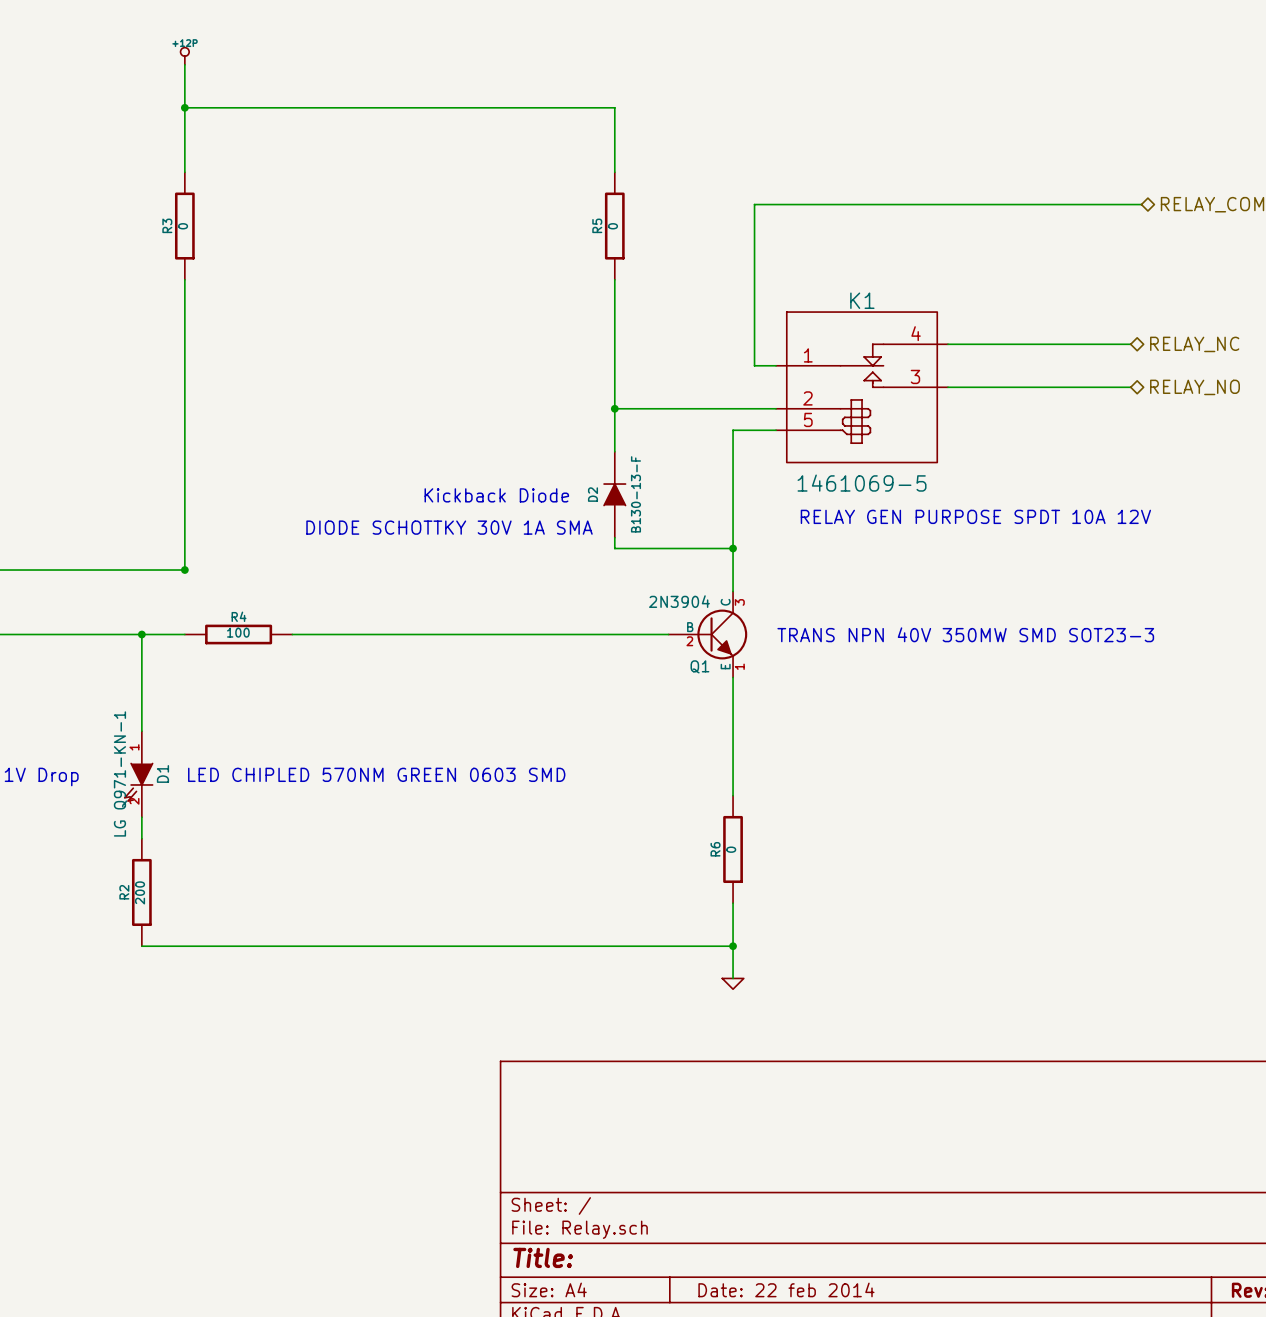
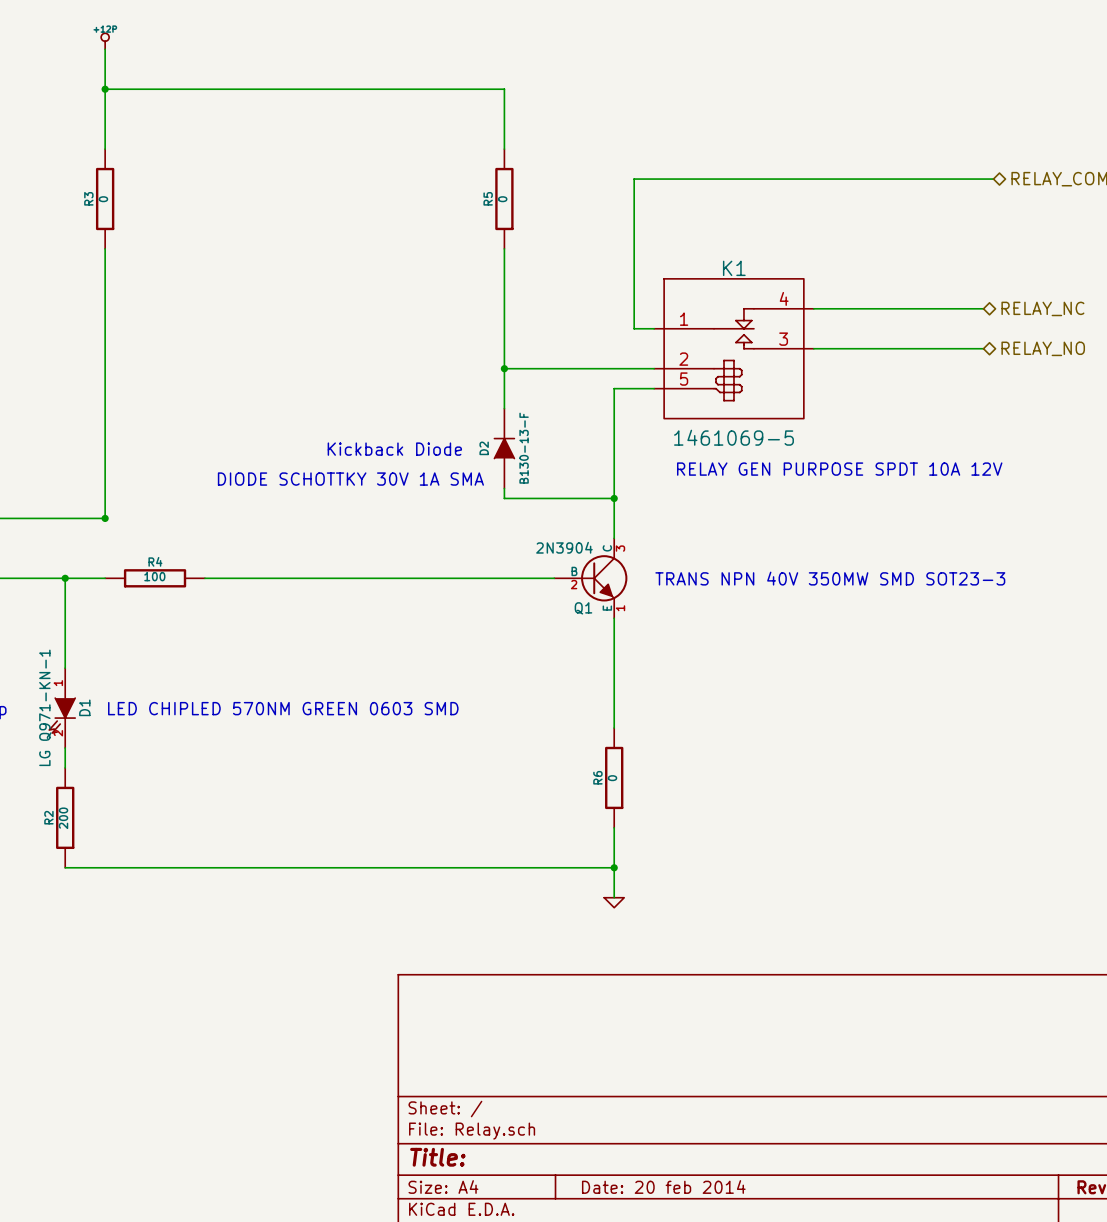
title block: Date: 22 feb 2014 (786, 1289) -> Date: 20 feb 2014 (663, 1187)

